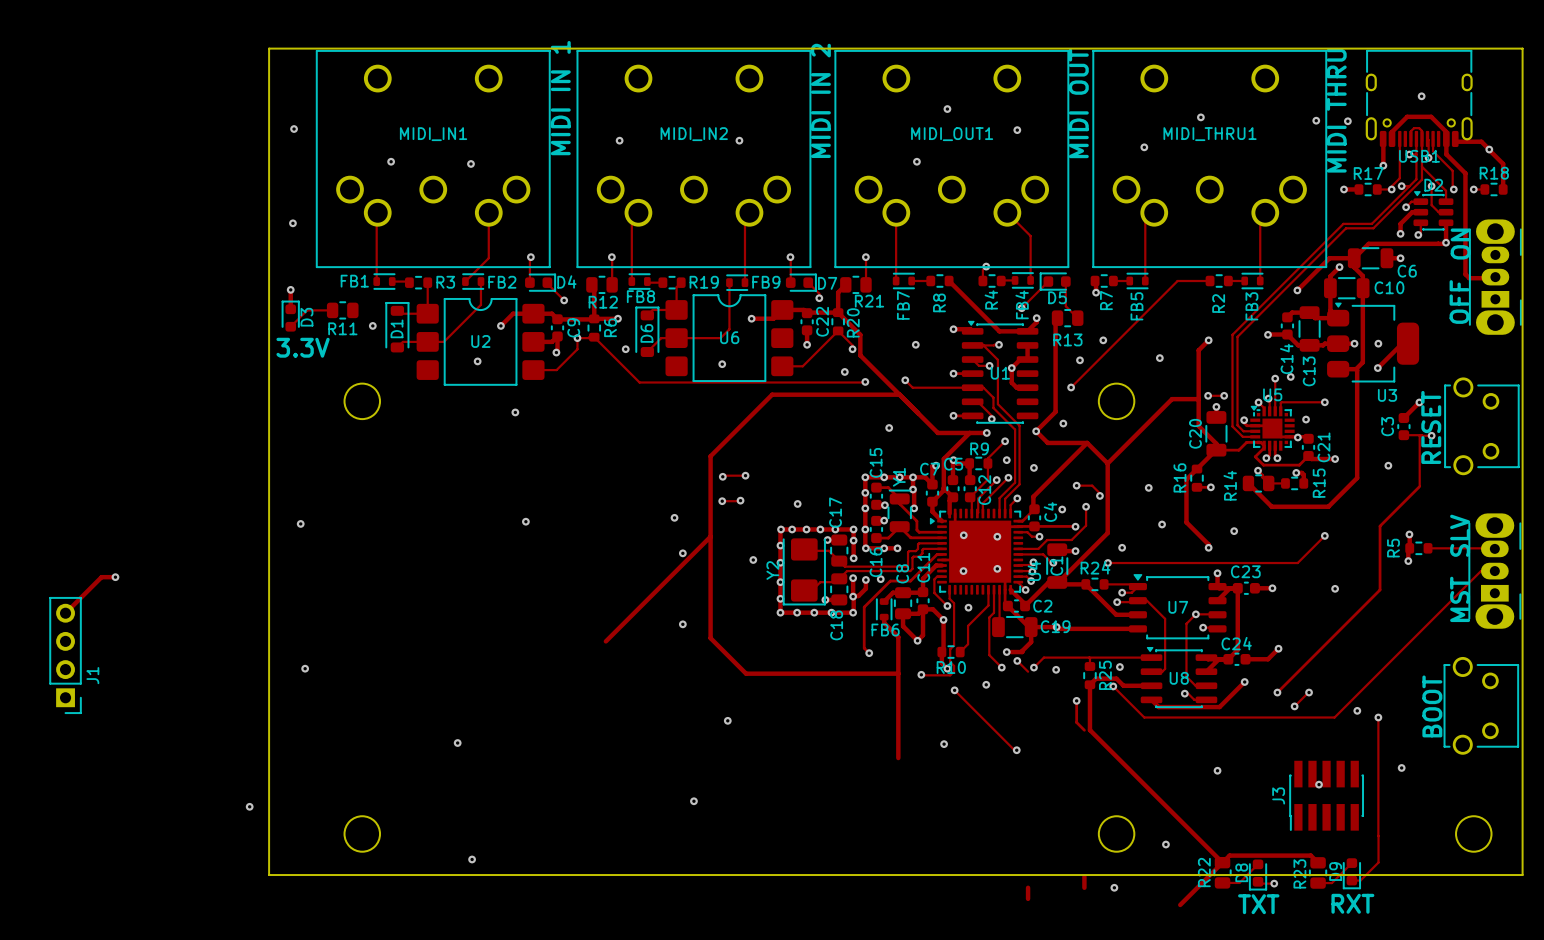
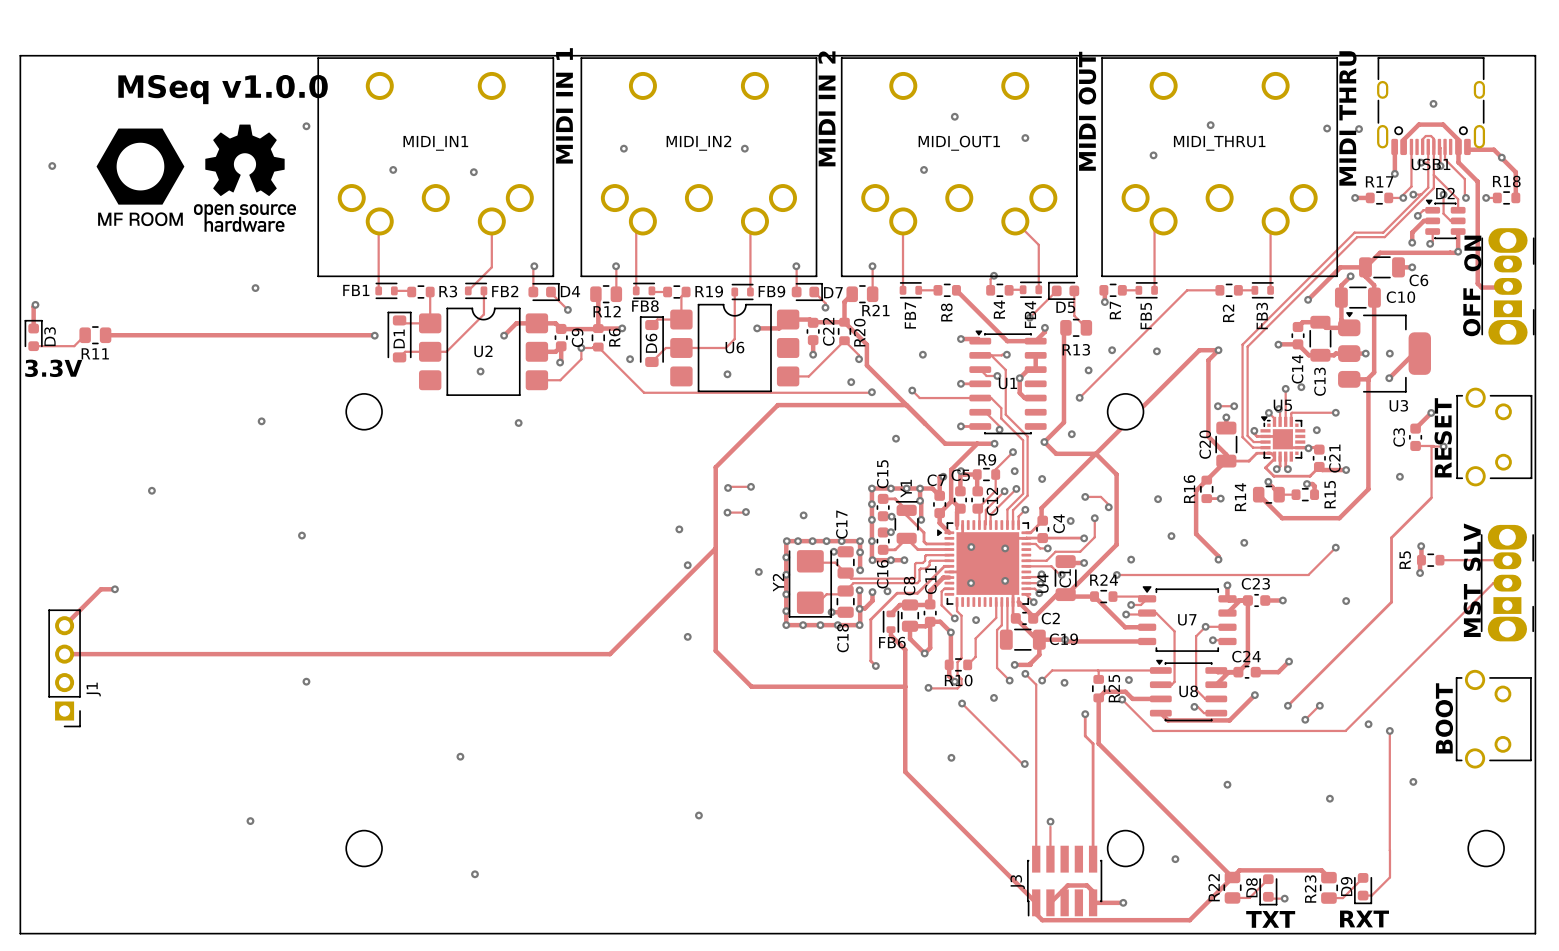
board edge: (269, 48) (269, 875) (1522, 875) -> (270, 55) (20, 55) (20, 933) (1535, 933) (1535, 889)
text: none -> MSeq v1.0.0 (223, 89)
drawing: none -> [96, 124, 297, 232]
via position: (294, 129) -> (306, 126)
via: none -> (52, 166)
via: (292, 223) -> none
via: none -> (255, 288)
track: (290, 289) (290, 309) -> none
via: (290, 289) -> none
track: none -> (35, 304) (33, 306) (33, 328)
via: none -> (35, 304)
track: (332, 310) (307, 310) (290, 326) -> none
R11 position: (342, 310) -> (95, 335)
D3 position: (290, 316) -> (33, 335)
track: none -> (85, 335) (74, 346) (33, 346)
track: none -> (105, 335) (374, 335)
track: none -> (1218, 350) (1199, 350) (1095, 453)
text position: 3.3V (303, 347) -> 3.3V (53, 368)
via position: (1159, 358) -> (1156, 351)
track: (1198, 399) (1172, 399) (1107, 463) -> none
via: none -> (261, 421)
via: none -> (151, 490)
via: (525, 521) -> none
track: none -> (64, 654) (610, 654)
track: none -> (1036, 684) (1036, 859)
via: (727, 720) -> none
track: none -> (1093, 743) (1093, 859)
track: none -> (905, 771) (1036, 902)
J3 position: (1326, 795) -> (1064, 881)
via: none -> (1050, 821)
track: none -> (1050, 826) (1050, 859)
track: none -> (1093, 891) (1086, 885) (1067, 885) (1050, 902)
track: none -> (1093, 902) (1123, 902)
track: none -> (1036, 914) (1042, 920) (1189, 920)

